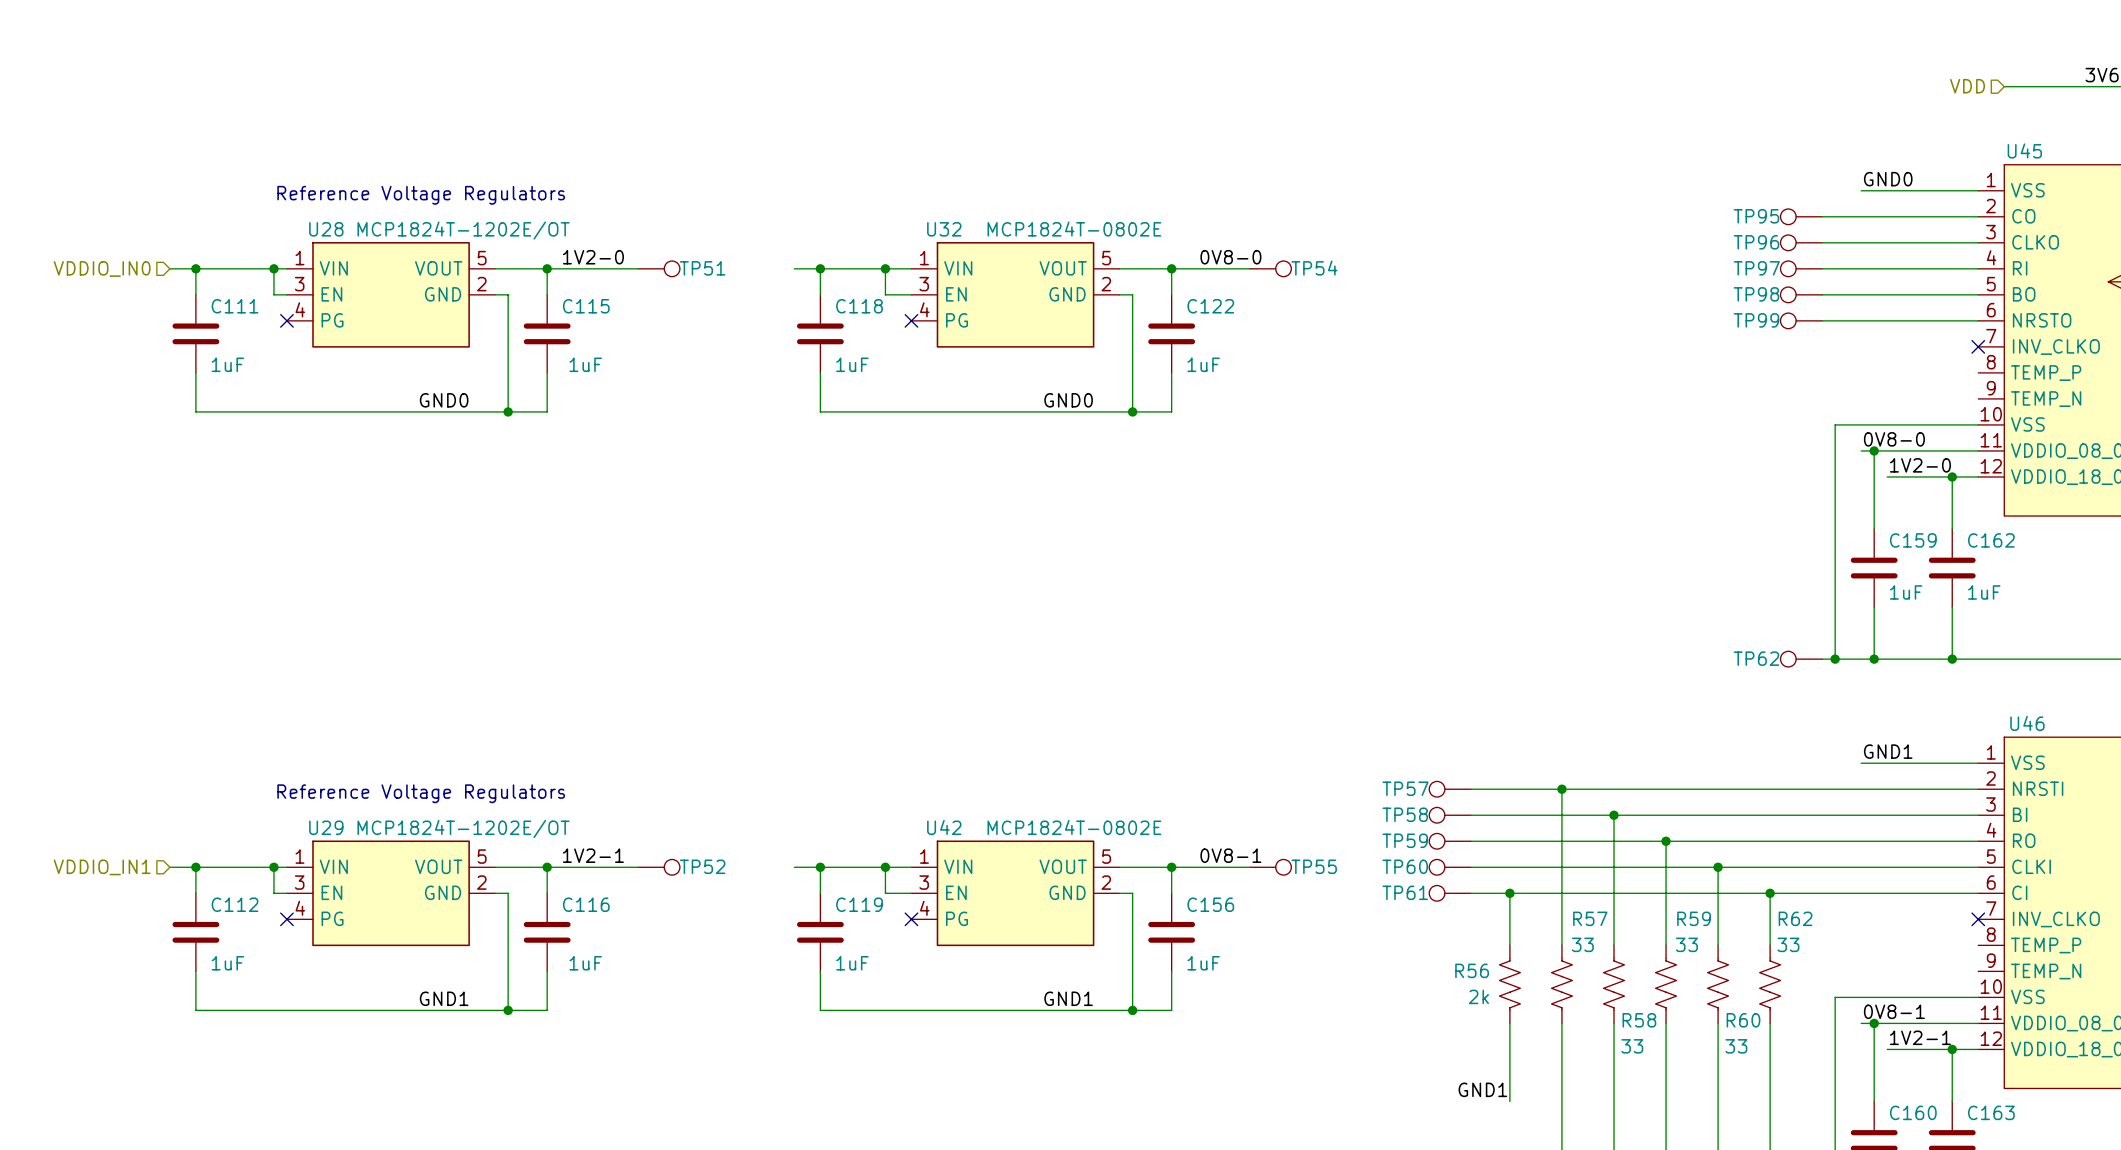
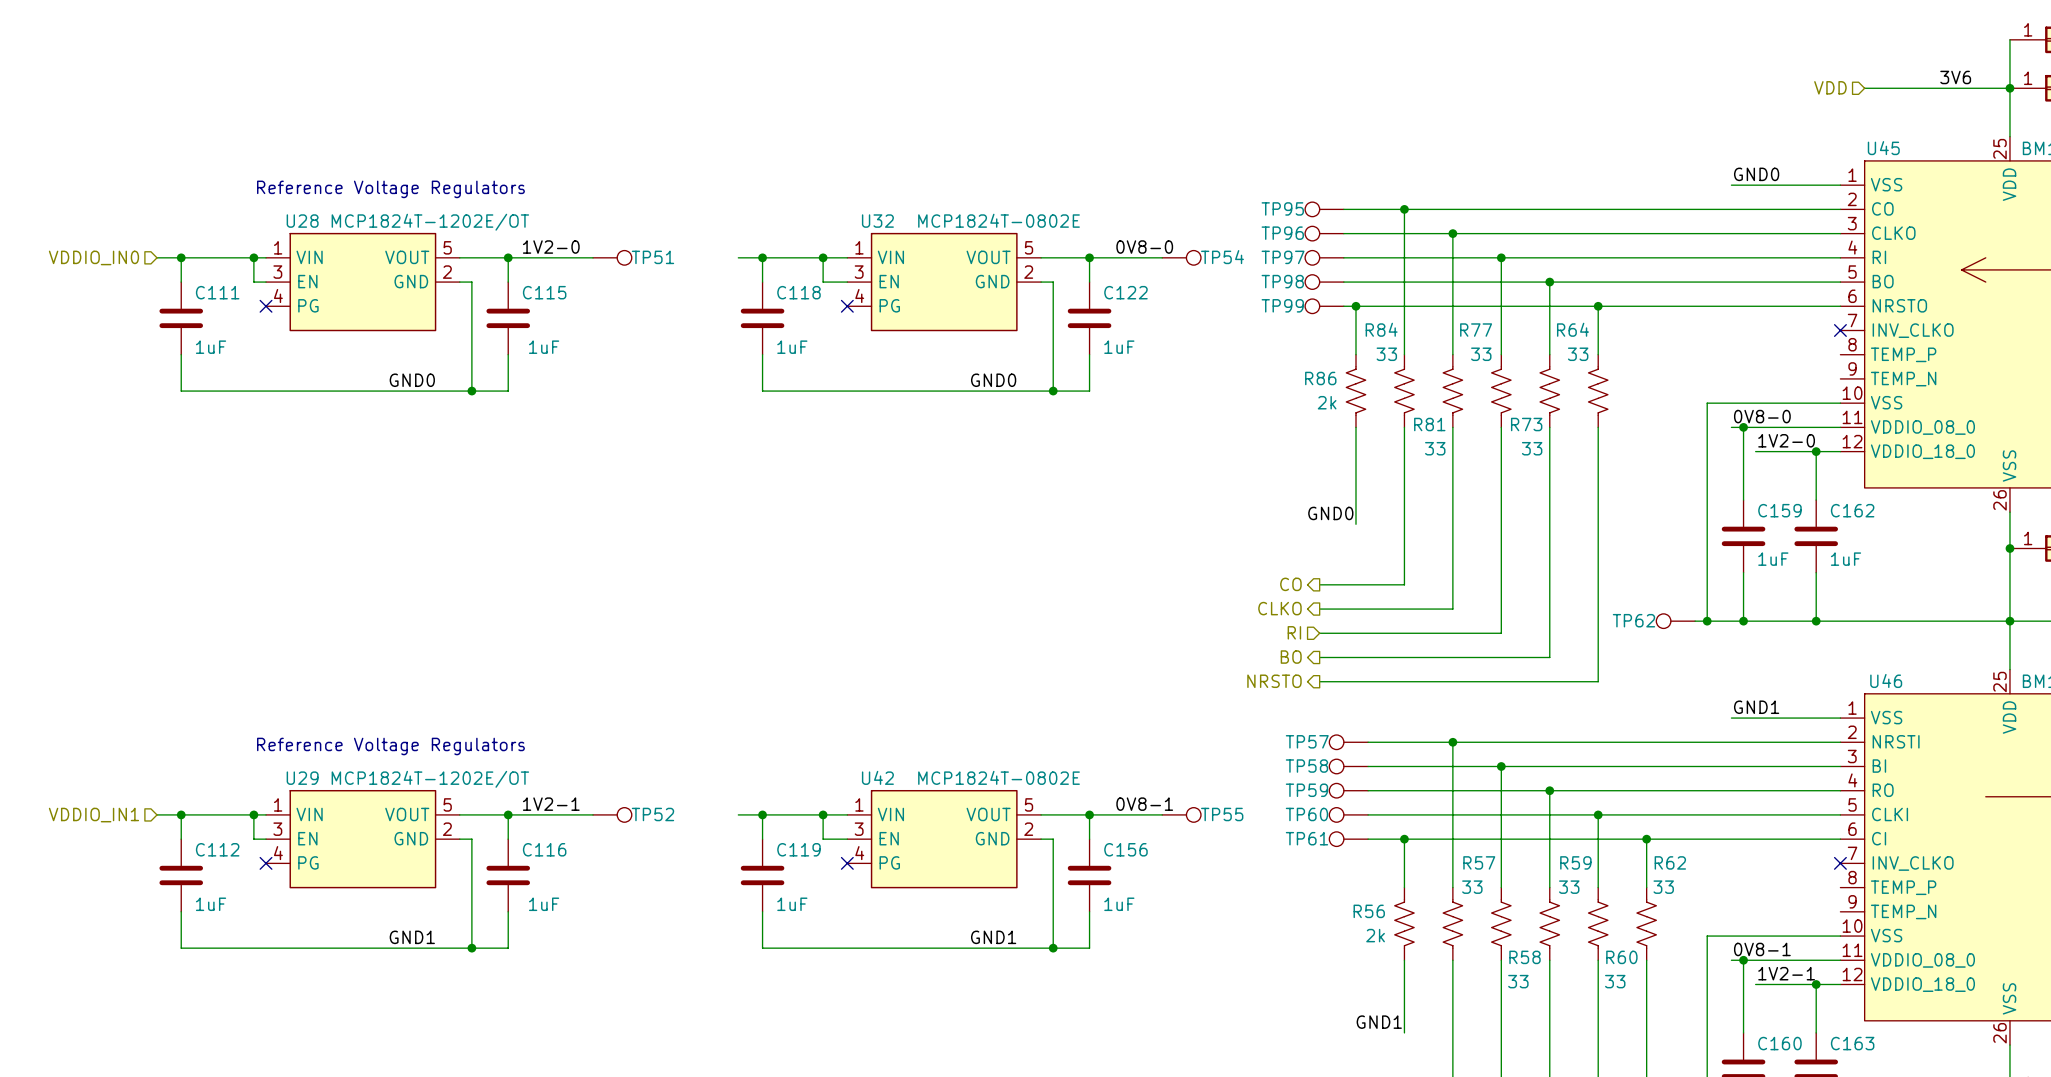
wire: none -> (1343, 209) (1695, 209)
wire: none -> (1404, 209) (1404, 354)
junction: none -> (1404, 209)
TP95 position: (1801, 216) -> (1324, 209)
wire: none -> (1343, 233) (1695, 233)
wire: none -> (1452, 233) (1452, 354)
junction: none -> (1452, 233)
TP96 position: (1801, 242) -> (1324, 233)
wire: none -> (1343, 257) (1695, 257)
wire: none -> (1501, 257) (1501, 354)
junction: none -> (1501, 257)
TP97 position: (1801, 268) -> (1324, 257)
wire: none -> (1343, 282) (1695, 282)
wire: none -> (1549, 282) (1549, 354)
junction: none -> (1549, 282)
TP98 position: (1801, 294) -> (1324, 282)
wire: none -> (1343, 306) (1695, 306)
wire: none -> (1355, 306) (1355, 354)
junction: none -> (1355, 306)
wire: none -> (1598, 306) (1598, 354)
junction: none -> (1598, 306)
TP99 position: (1801, 320) -> (1324, 306)
R86: none -> 2k (1355, 391)
R84: none -> 33 (1404, 391)
R81: none -> 33 (1452, 391)
R77: none -> 33 (1501, 391)
R73: none -> 33 (1549, 391)
R64: none -> 33 (1598, 391)
wire: none -> (1355, 427) (1355, 524)
wire: none -> (1404, 427) (1404, 584) (1319, 584)
wire: none -> (1452, 427) (1452, 609) (1319, 609)
wire: none -> (1501, 427) (1501, 633) (1319, 633)
wire: none -> (1549, 427) (1549, 657) (1319, 657)
wire: none -> (1598, 427) (1598, 681) (1319, 681)
label: none -> GND0 (1330, 513)
hierarchical label: none -> CO (1290, 584)
hierarchical label: none -> CLKO (1279, 608)
hierarchical label: none -> RI (1294, 632)
hierarchical label: none -> BO (1291, 657)
hierarchical label: none -> NRSTO (1274, 681)

